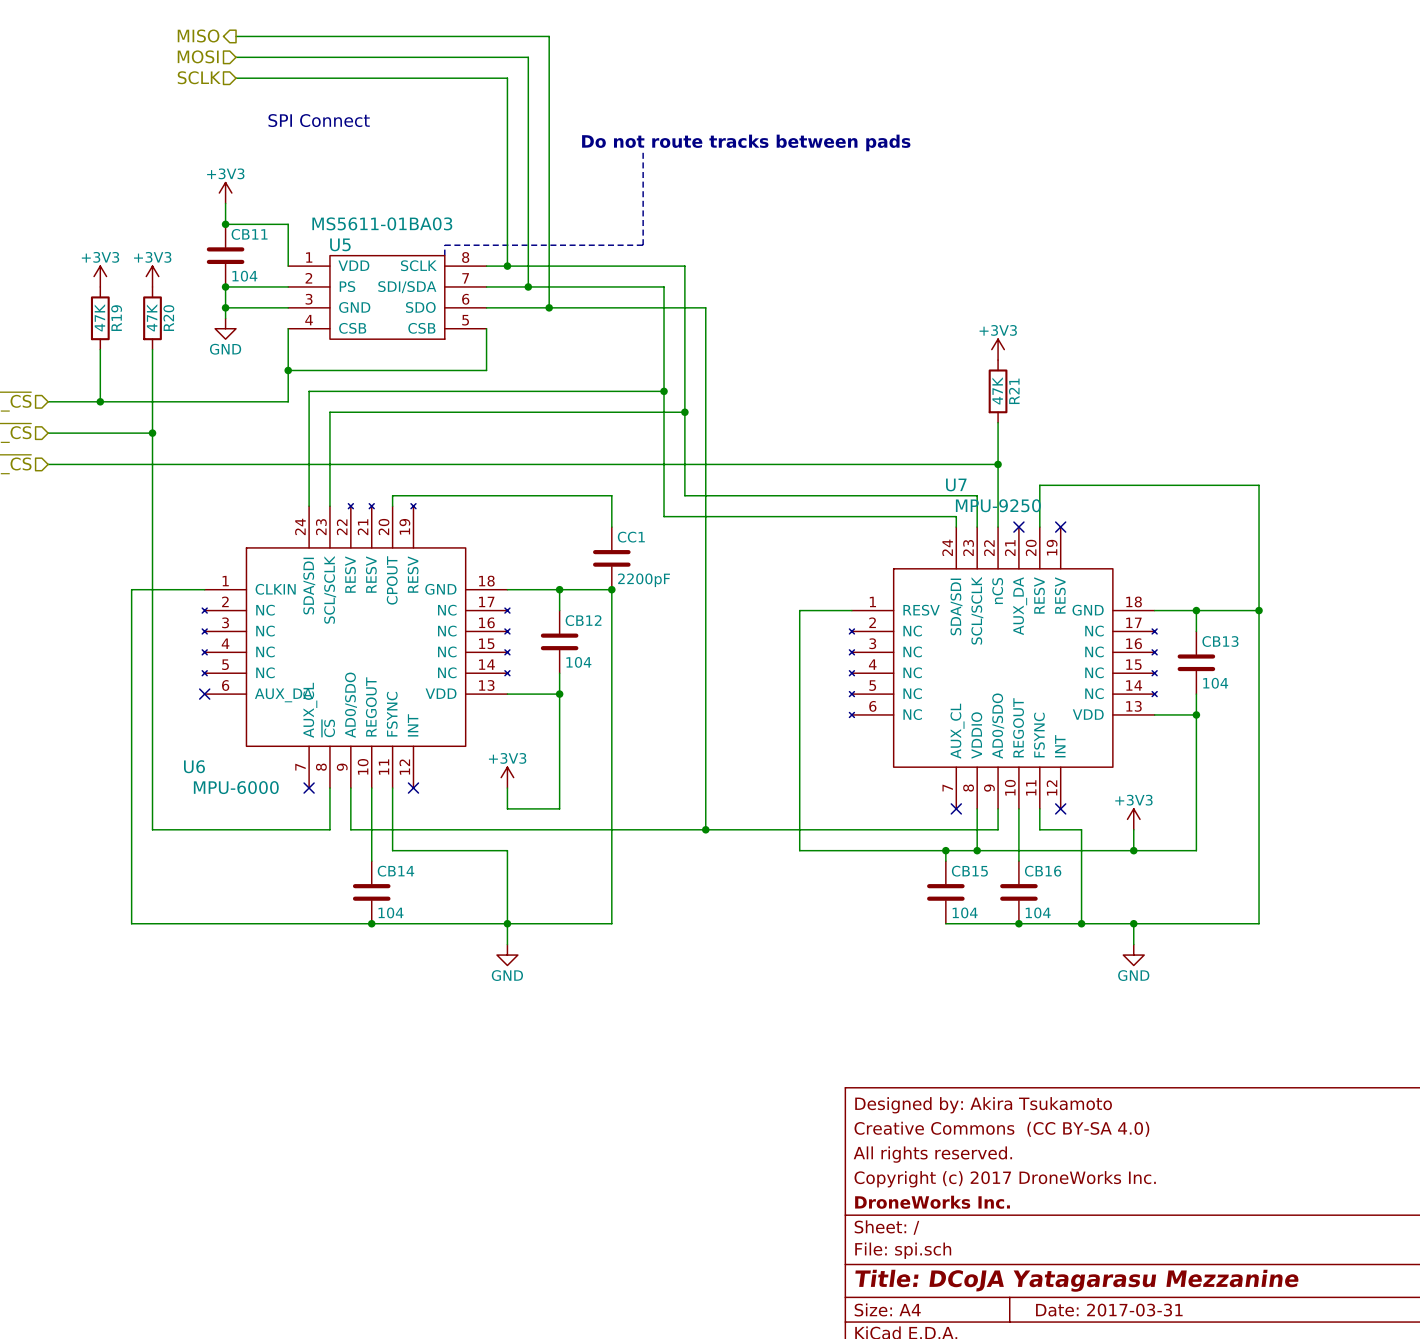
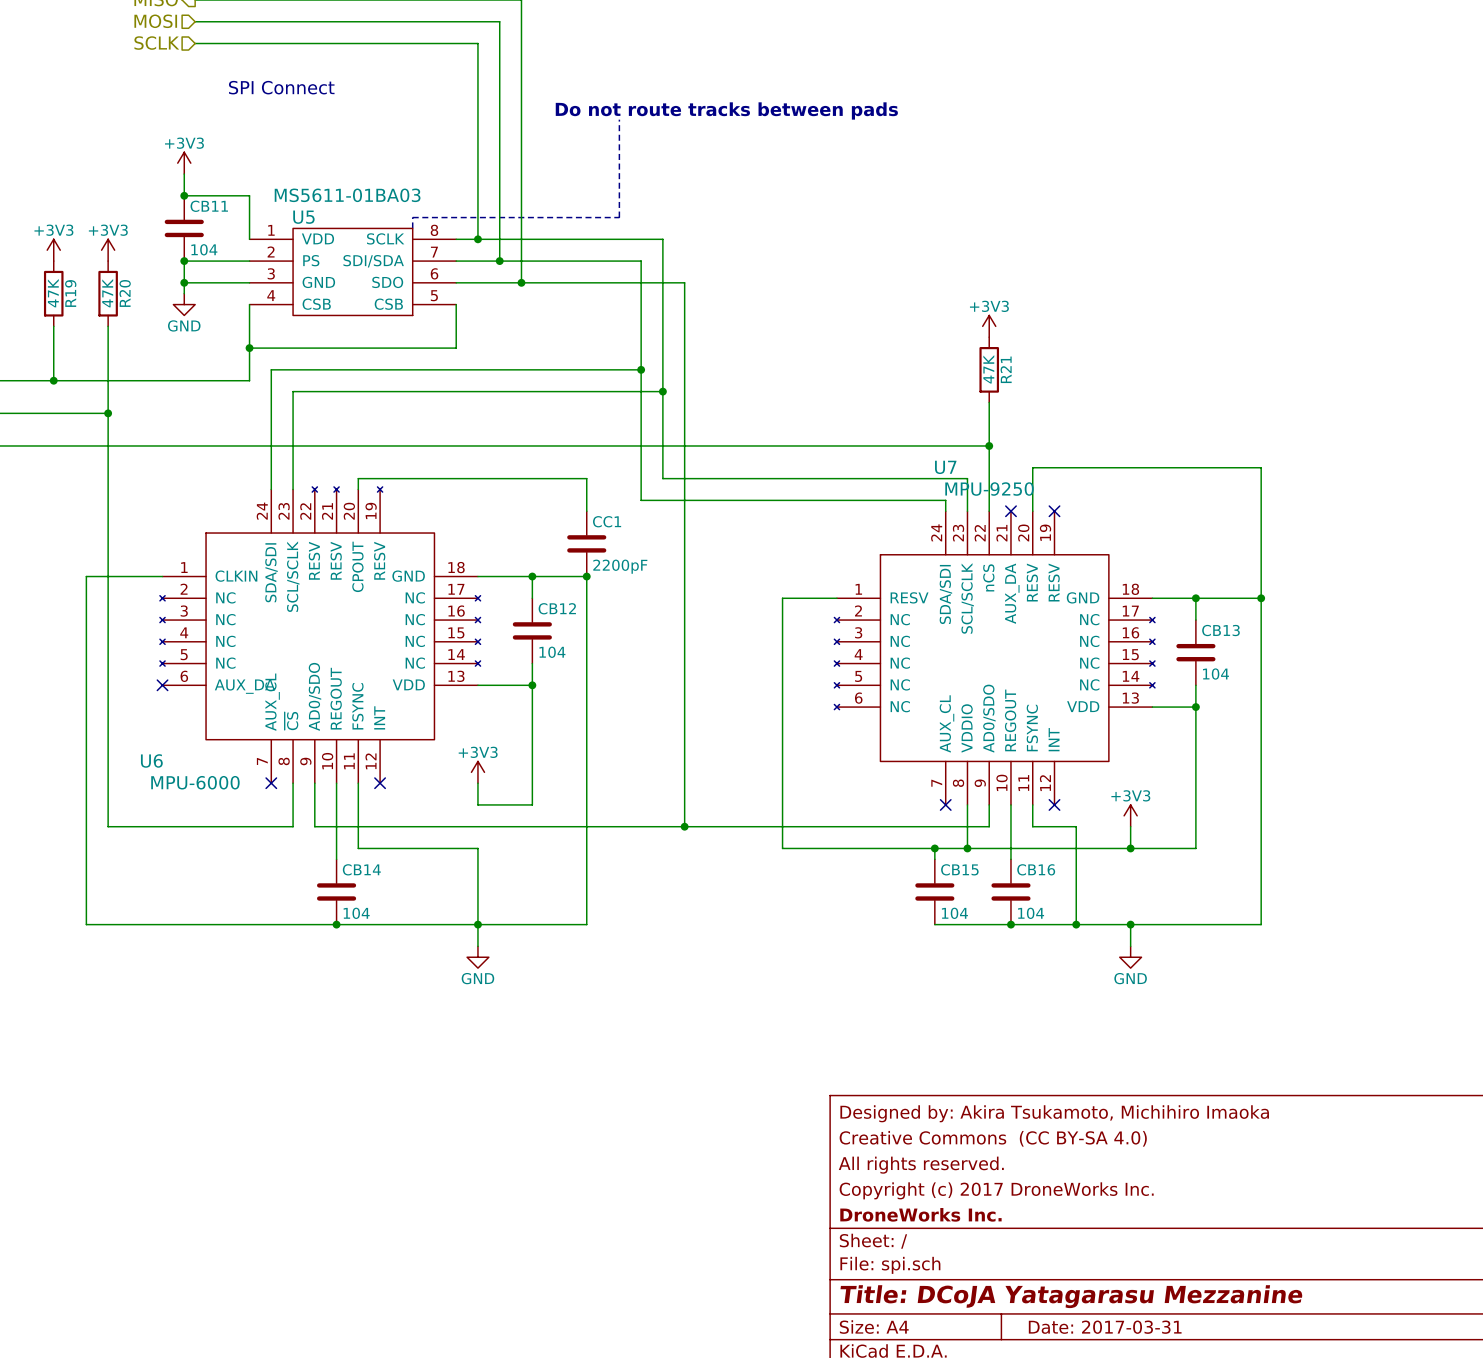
title block: Designed by: Akira Tsukamoto (983, 1105) -> Designed by: Akira Tsukamoto, Michihiro Imaoka (1054, 1113)

